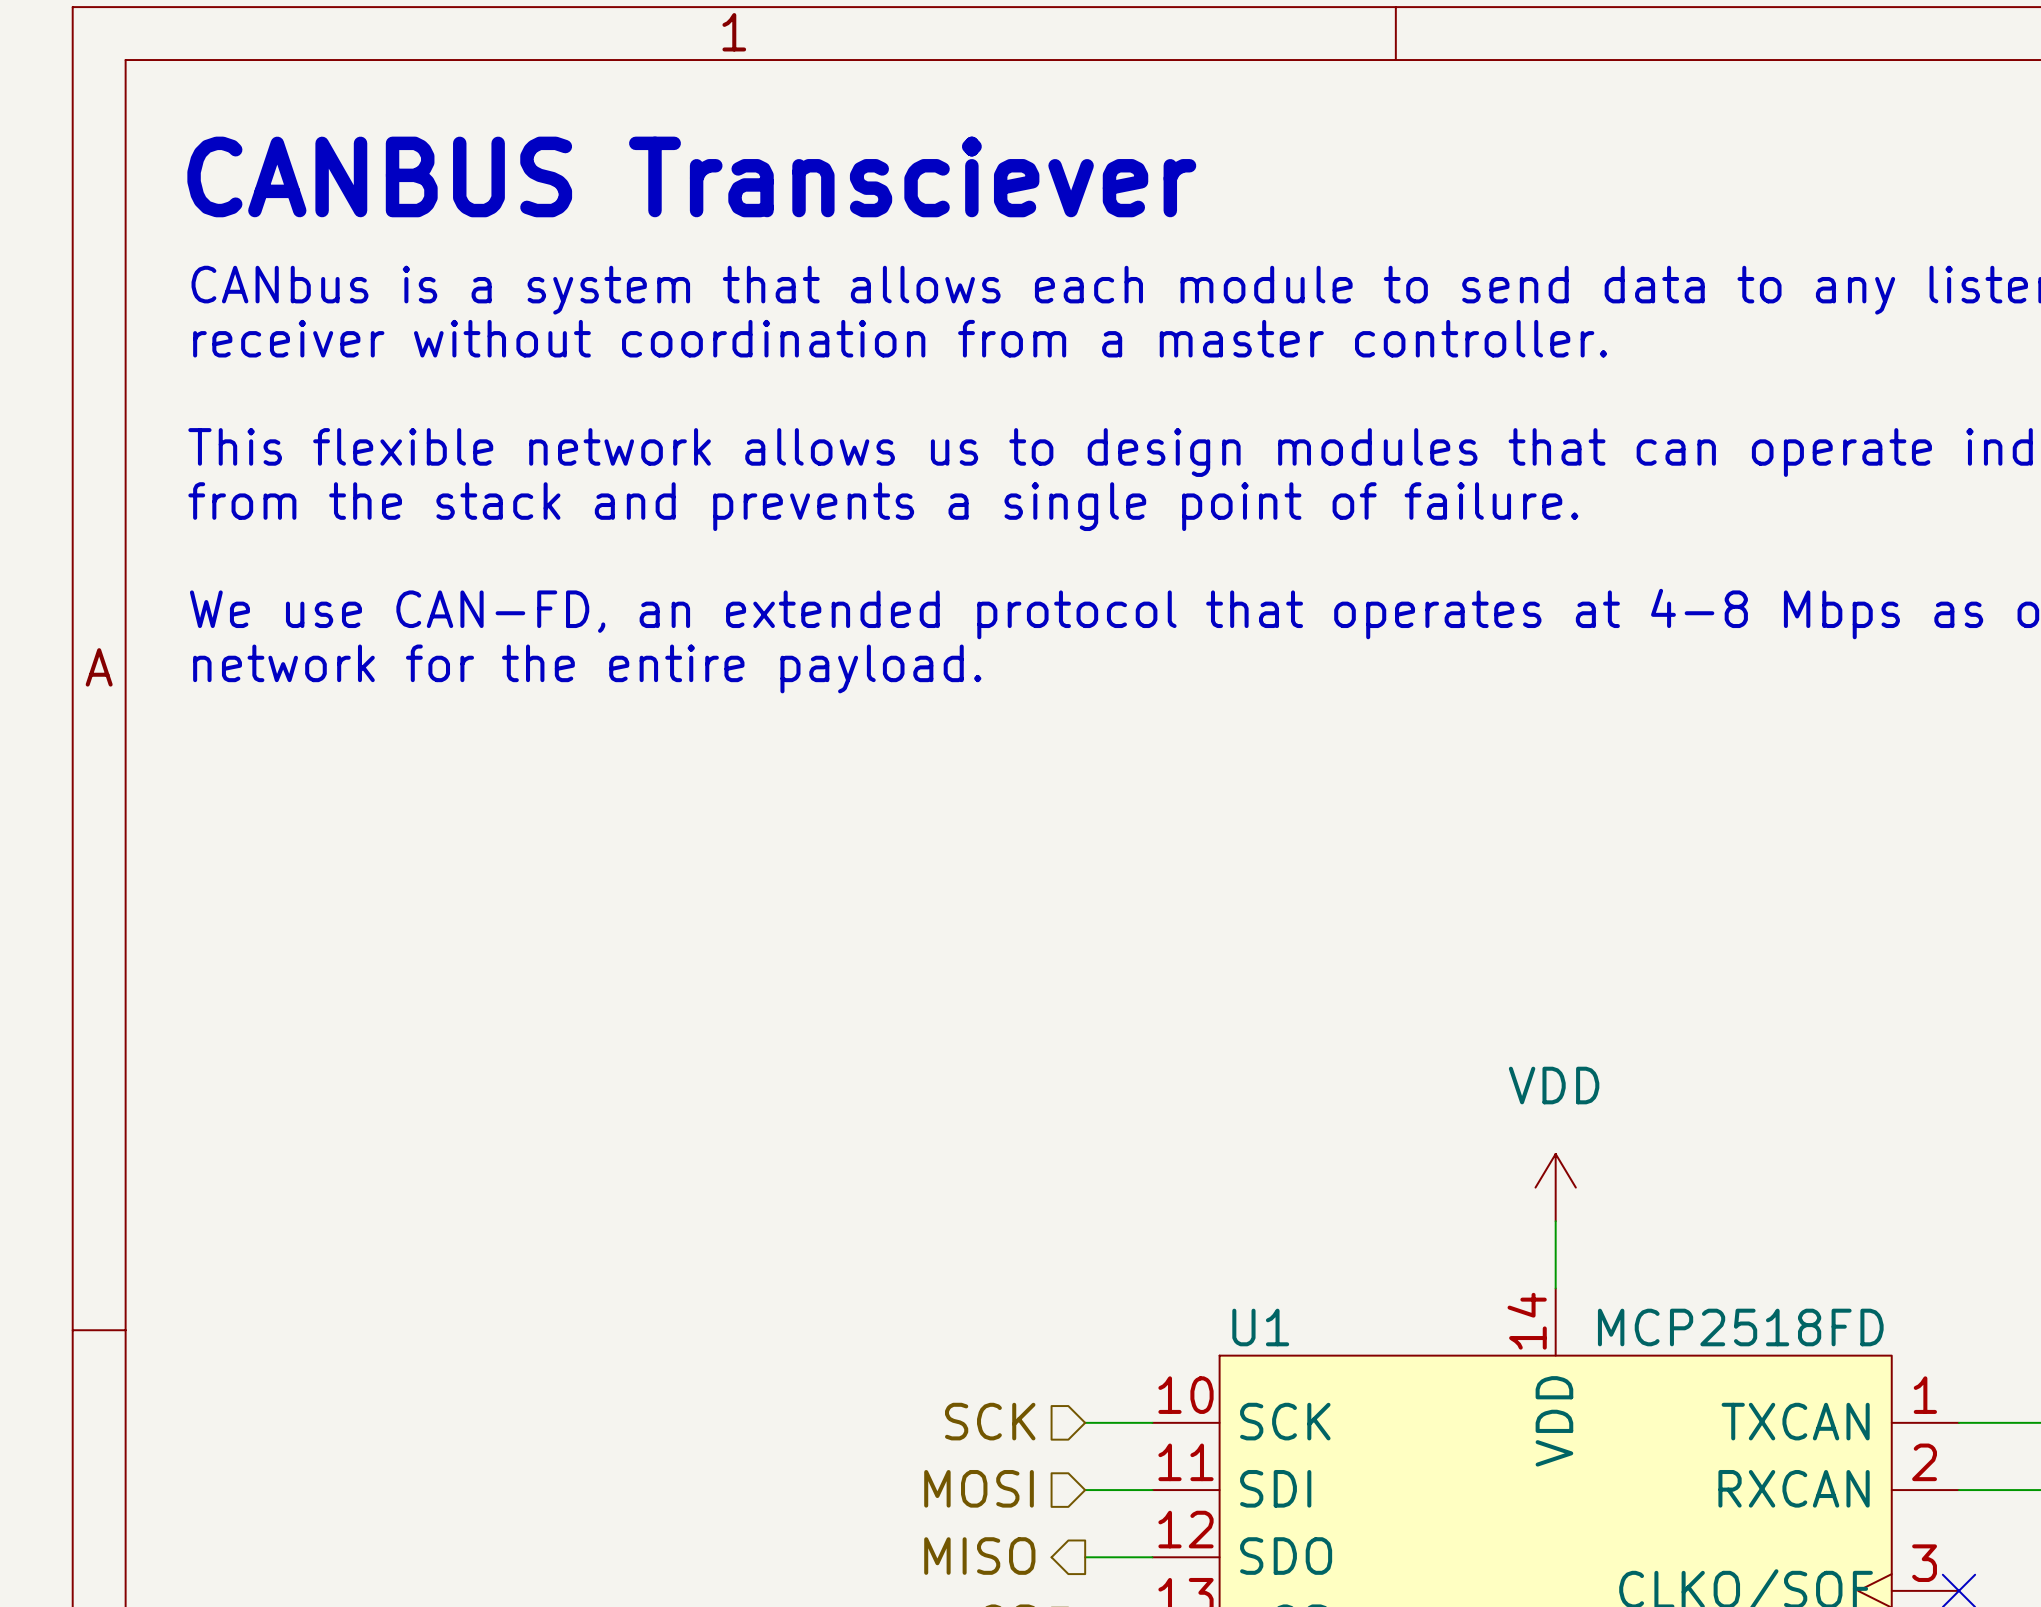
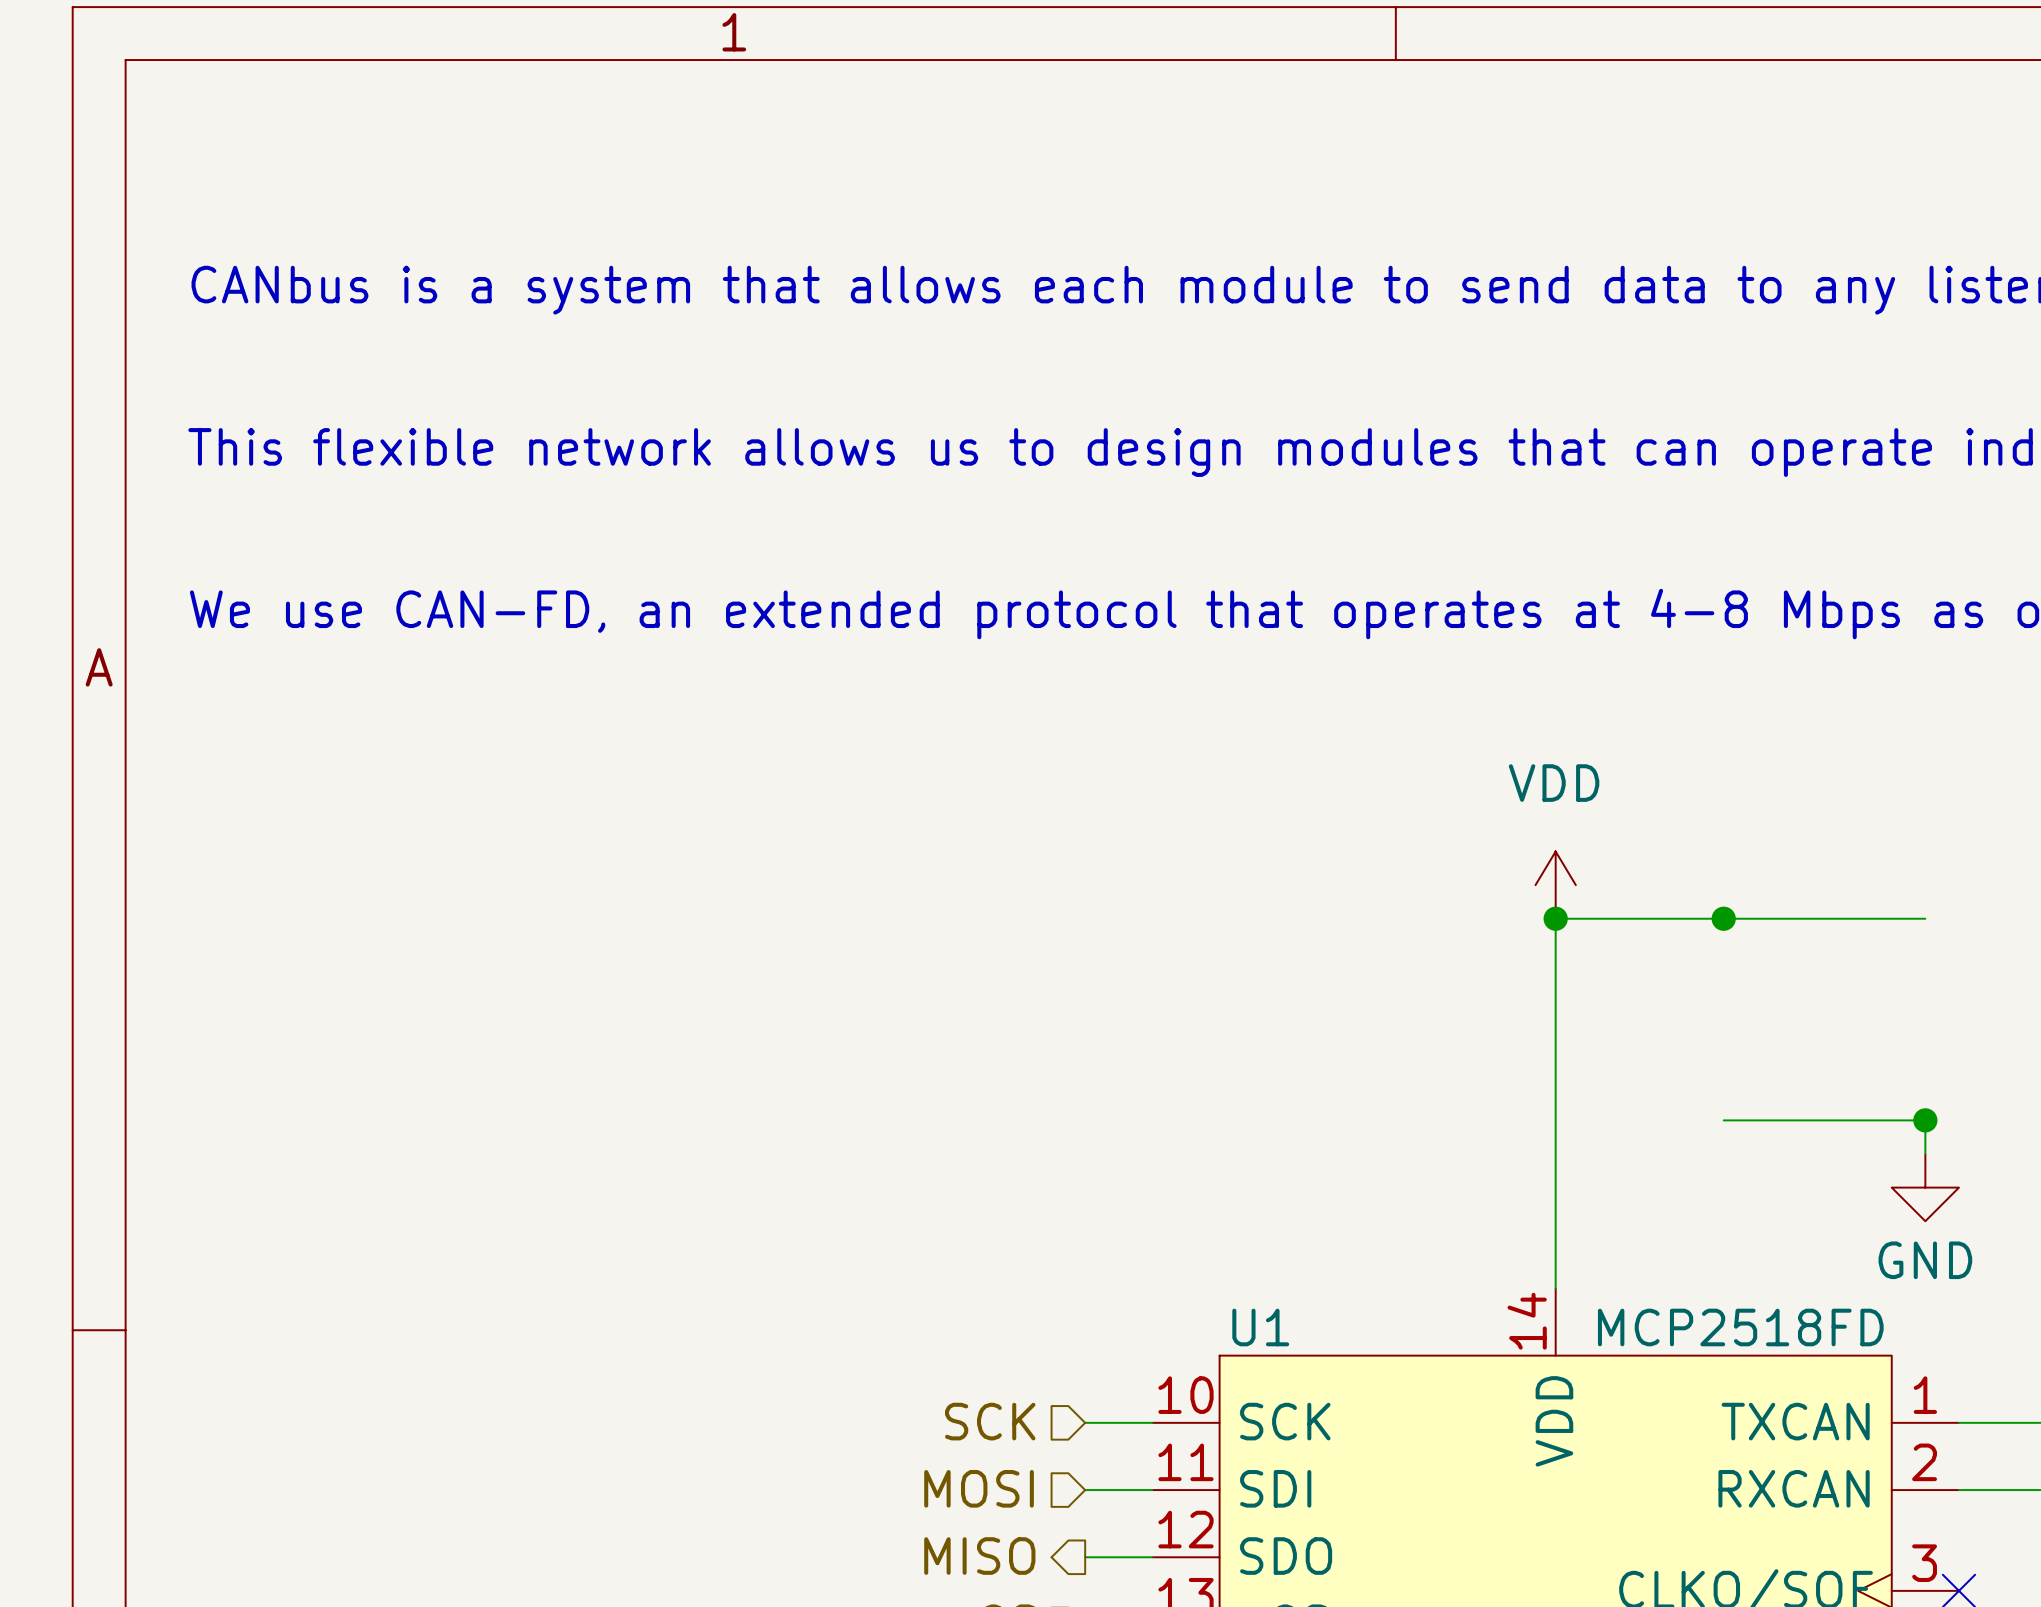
text: CANBUS Transciever (691, 176) -> none
text: receiver without coordination from a master controller. (900, 338) -> none
text: from the stack and prevents a single point of failure. (883, 506) -> none
text: network for the entire payload. (587, 668) -> none
junction: none -> (1555, 918)
junction: none -> (1723, 918)
wire: none -> (1925, 918) (1555, 918) (1555, 1221)
wire: none -> (1723, 1120) (1925, 1120) (1925, 1153)
junction: none -> (1925, 1120)
power symbol position: VDD (1555, 1187) -> VDD (1555, 885)
power symbol: none -> GND (1925, 1187)

